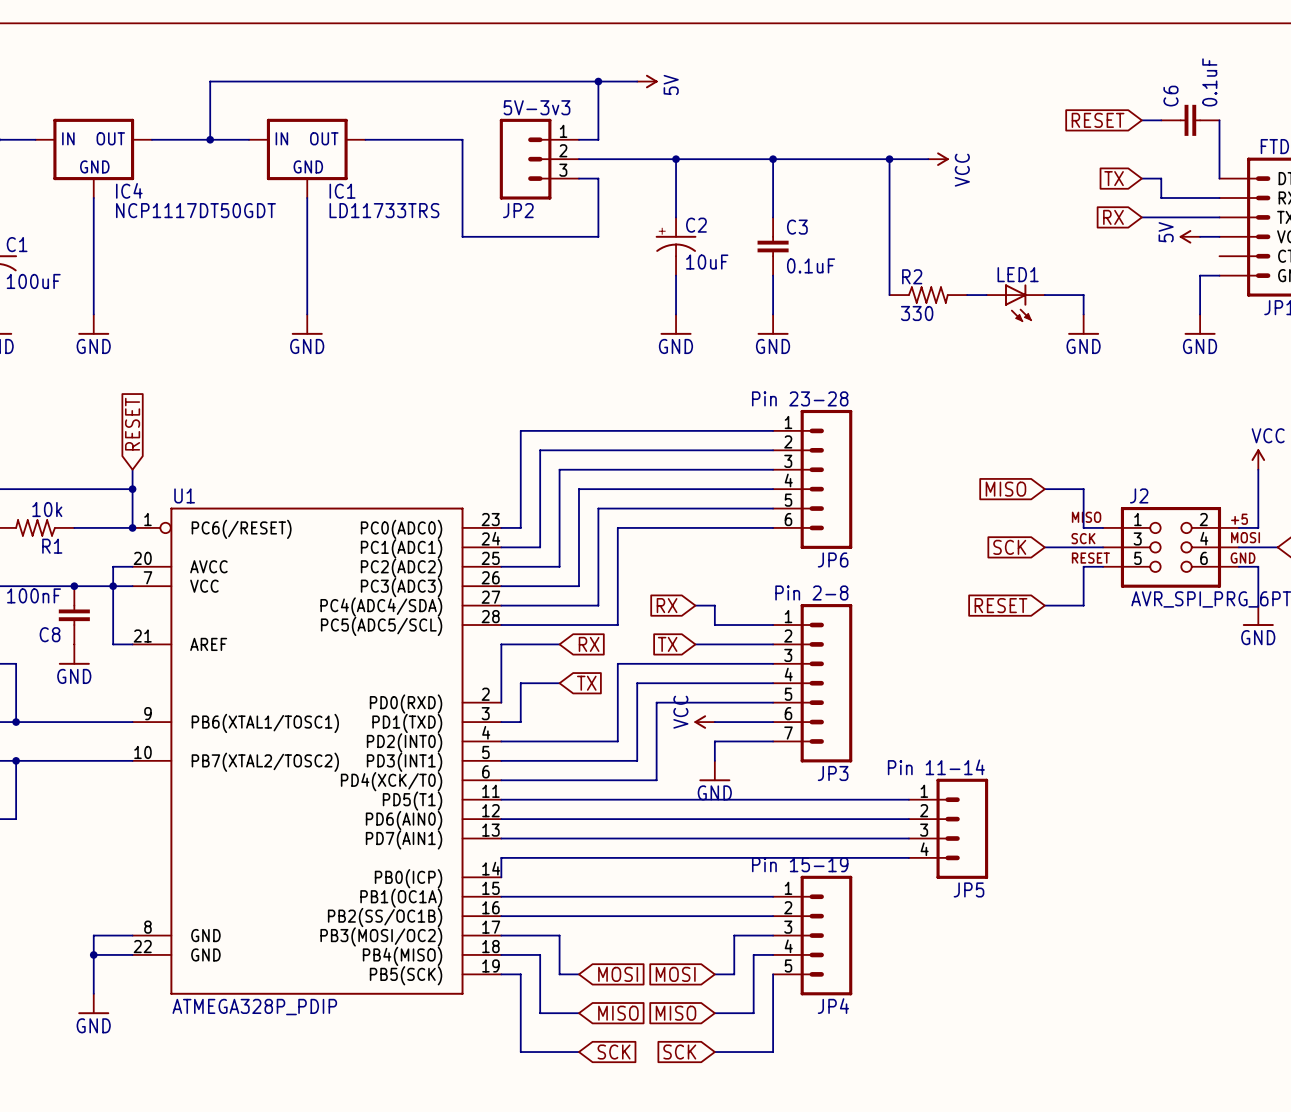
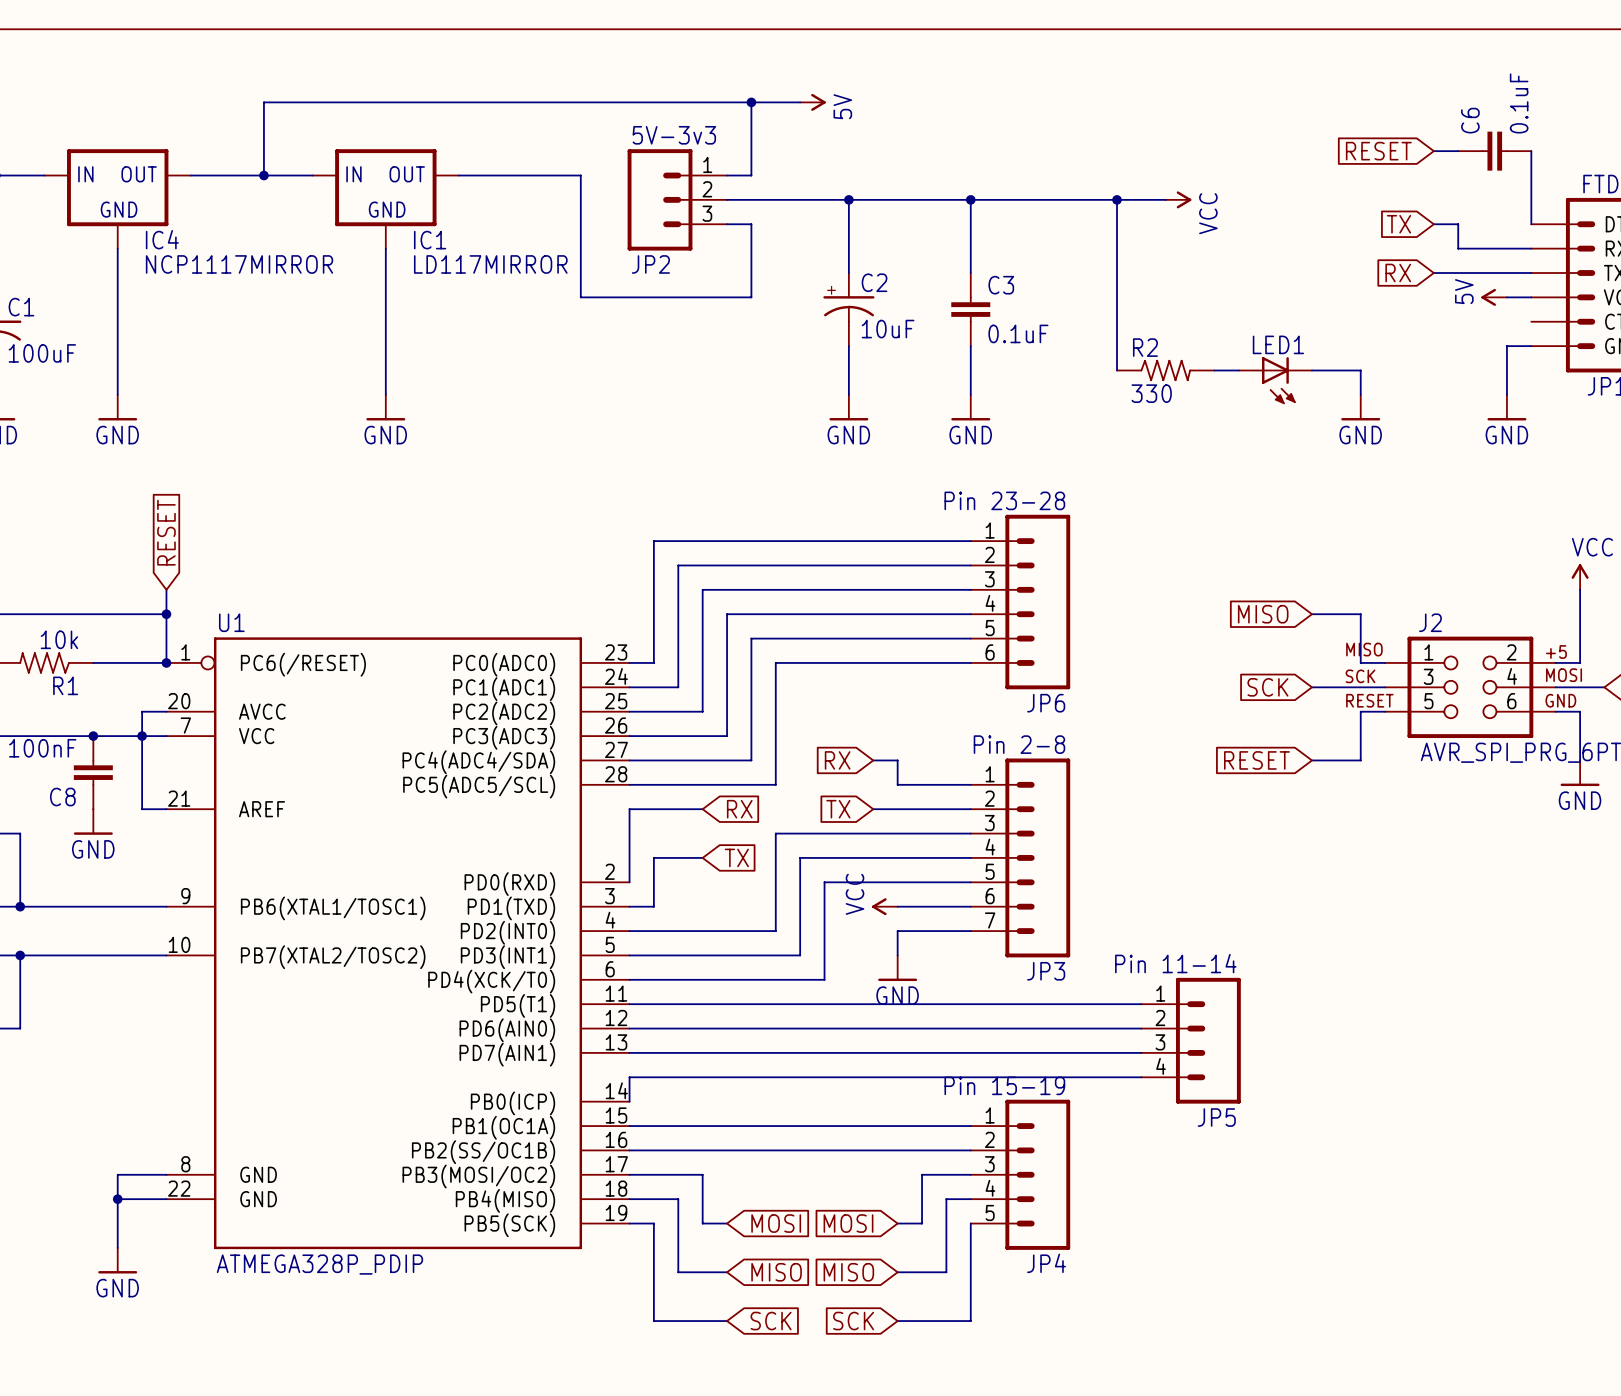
IC4 value: NCP1117DT50GDT (195, 210) -> NCP1117MIRROR (239, 264)
IC1 value: LD11733TRS (384, 210) -> LD117MIRROR (490, 264)

